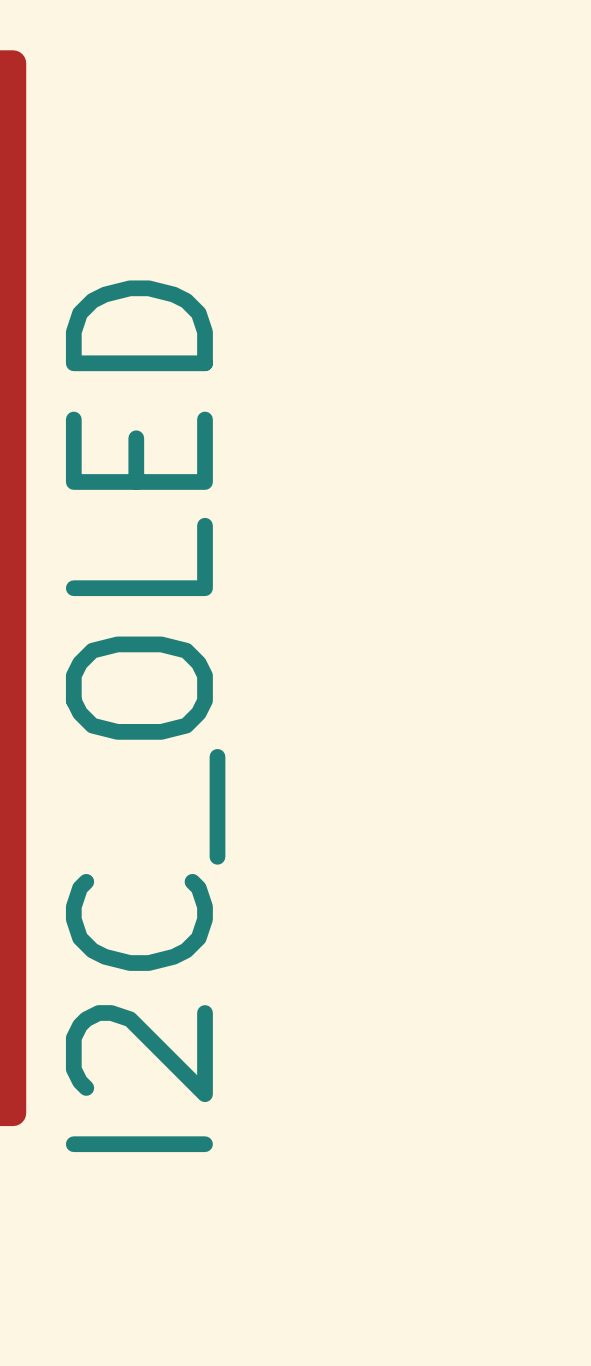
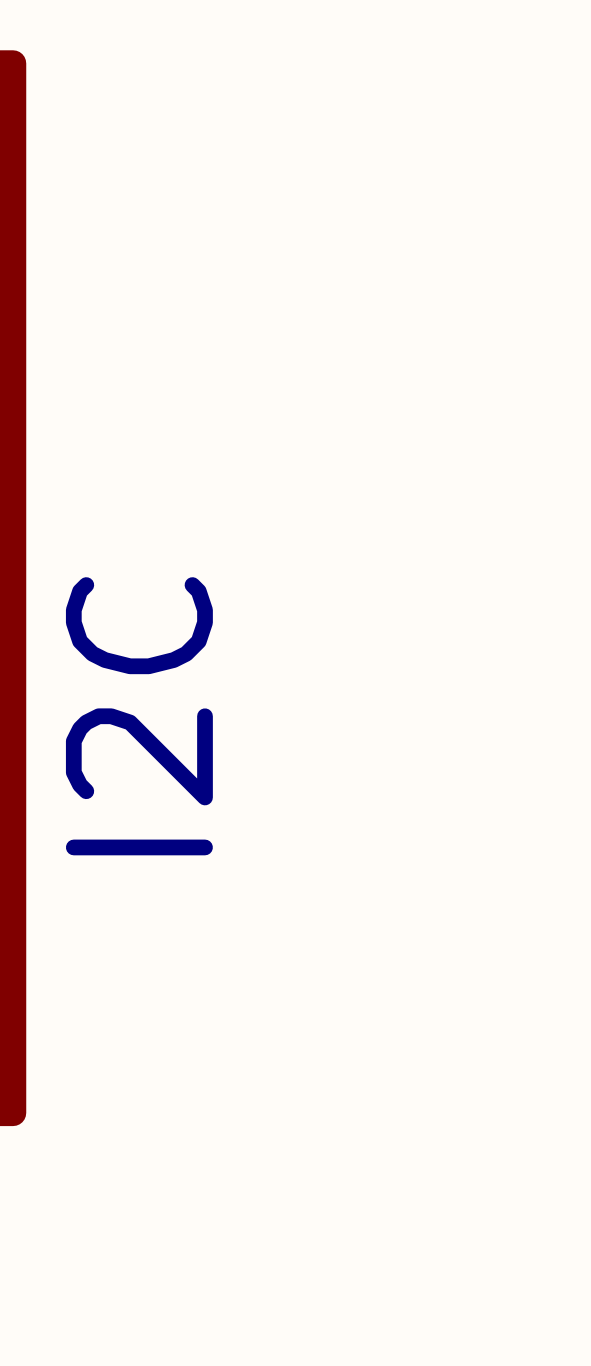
part value: I2C_OLED (145, 716) -> I2C (139, 716)

